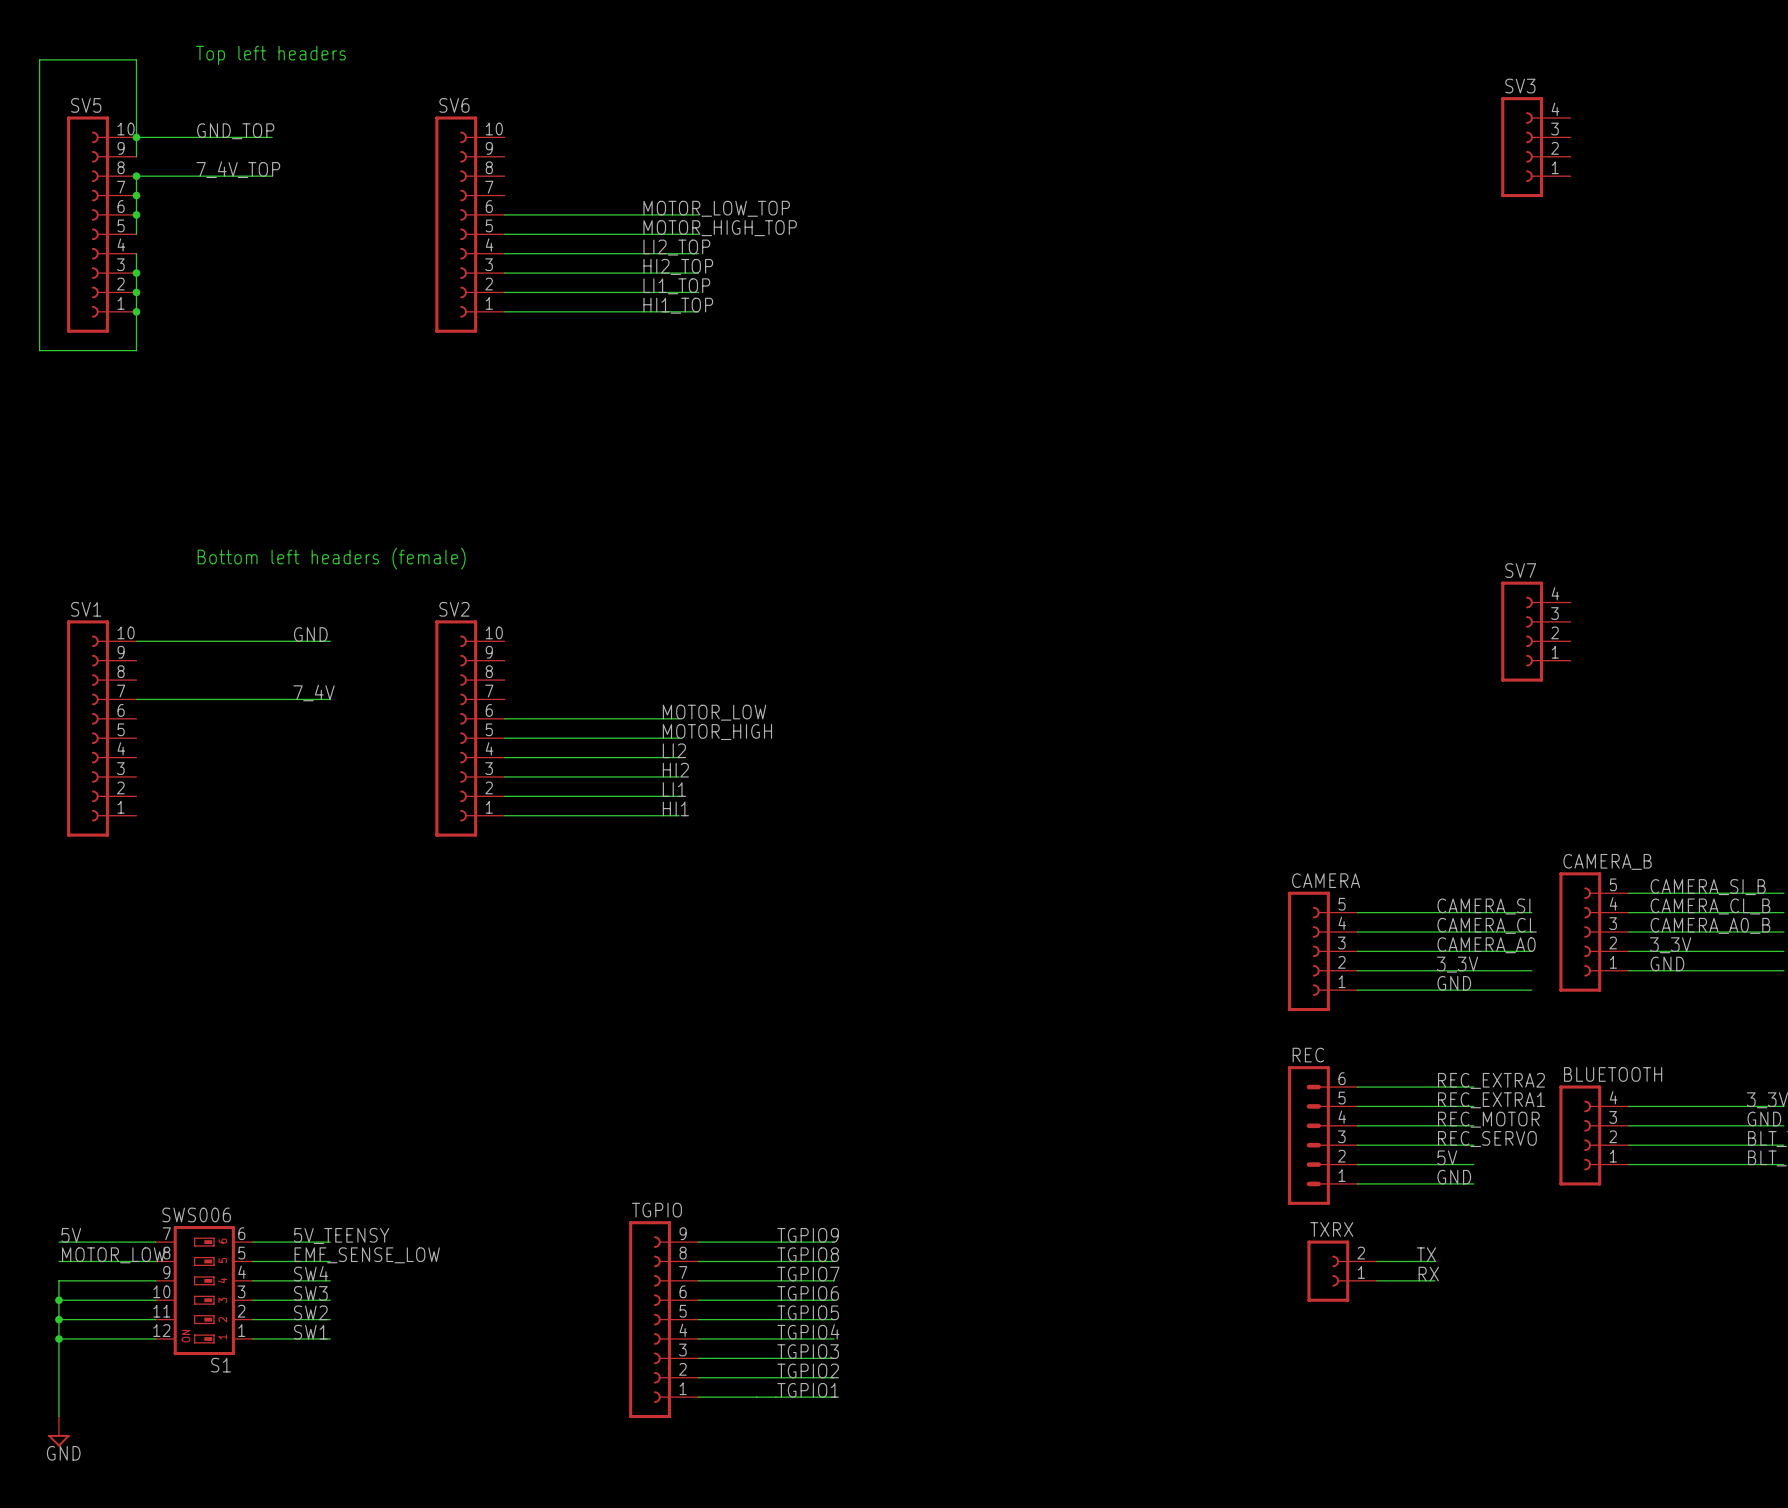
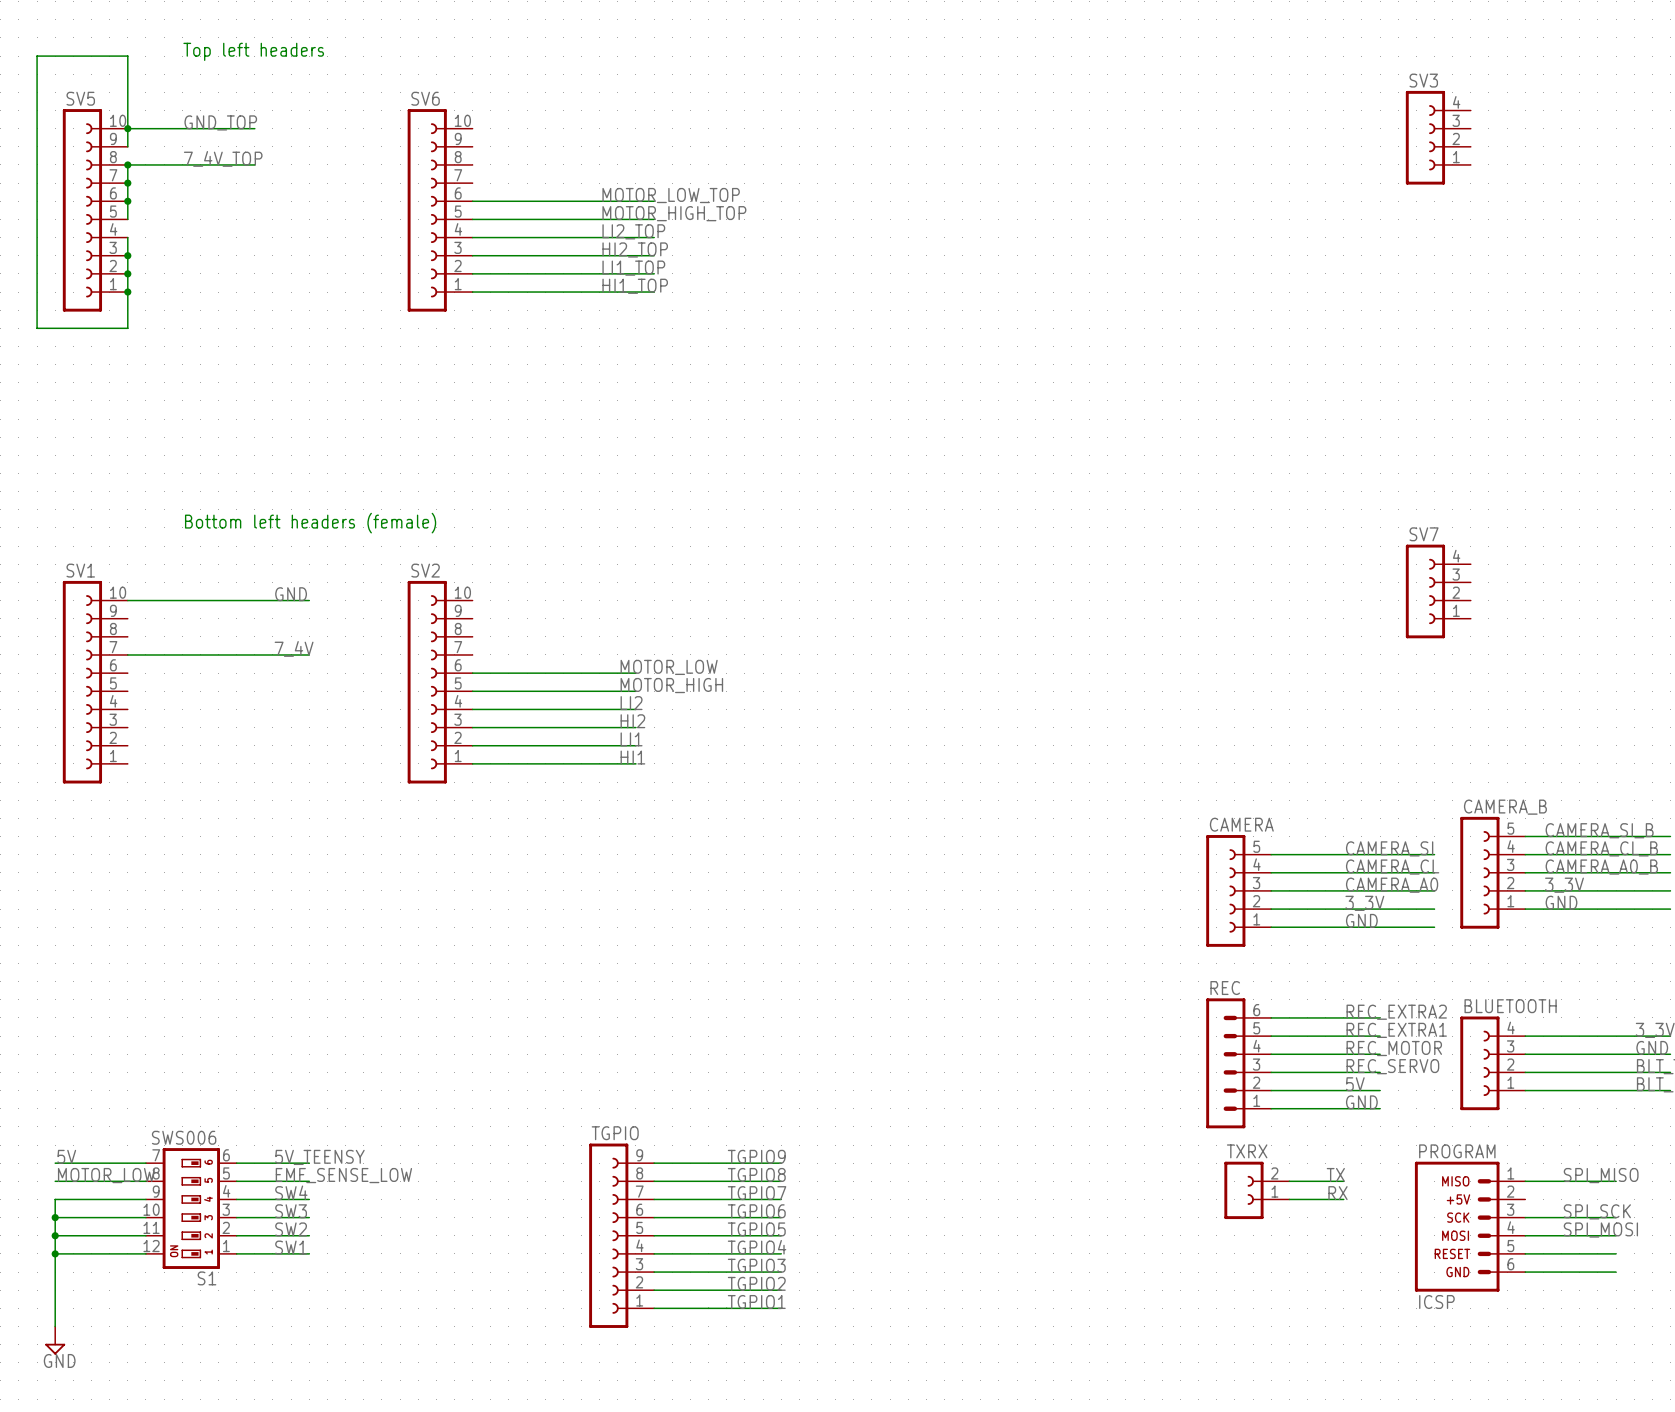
label: none -> SPI_MISO (1601, 1175)
wire: none -> (1525, 1181) (1616, 1181)
label: none -> SPI_SCK (1597, 1211)
wire: none -> (1525, 1217) (1616, 1217)
PROGRAM: none -> (1470, 1226)
label: none -> SPI_MOSI (1600, 1230)
wire: none -> (1525, 1235) (1616, 1235)
wire: none -> (1525, 1253) (1616, 1253)
wire: none -> (1525, 1272) (1616, 1272)

